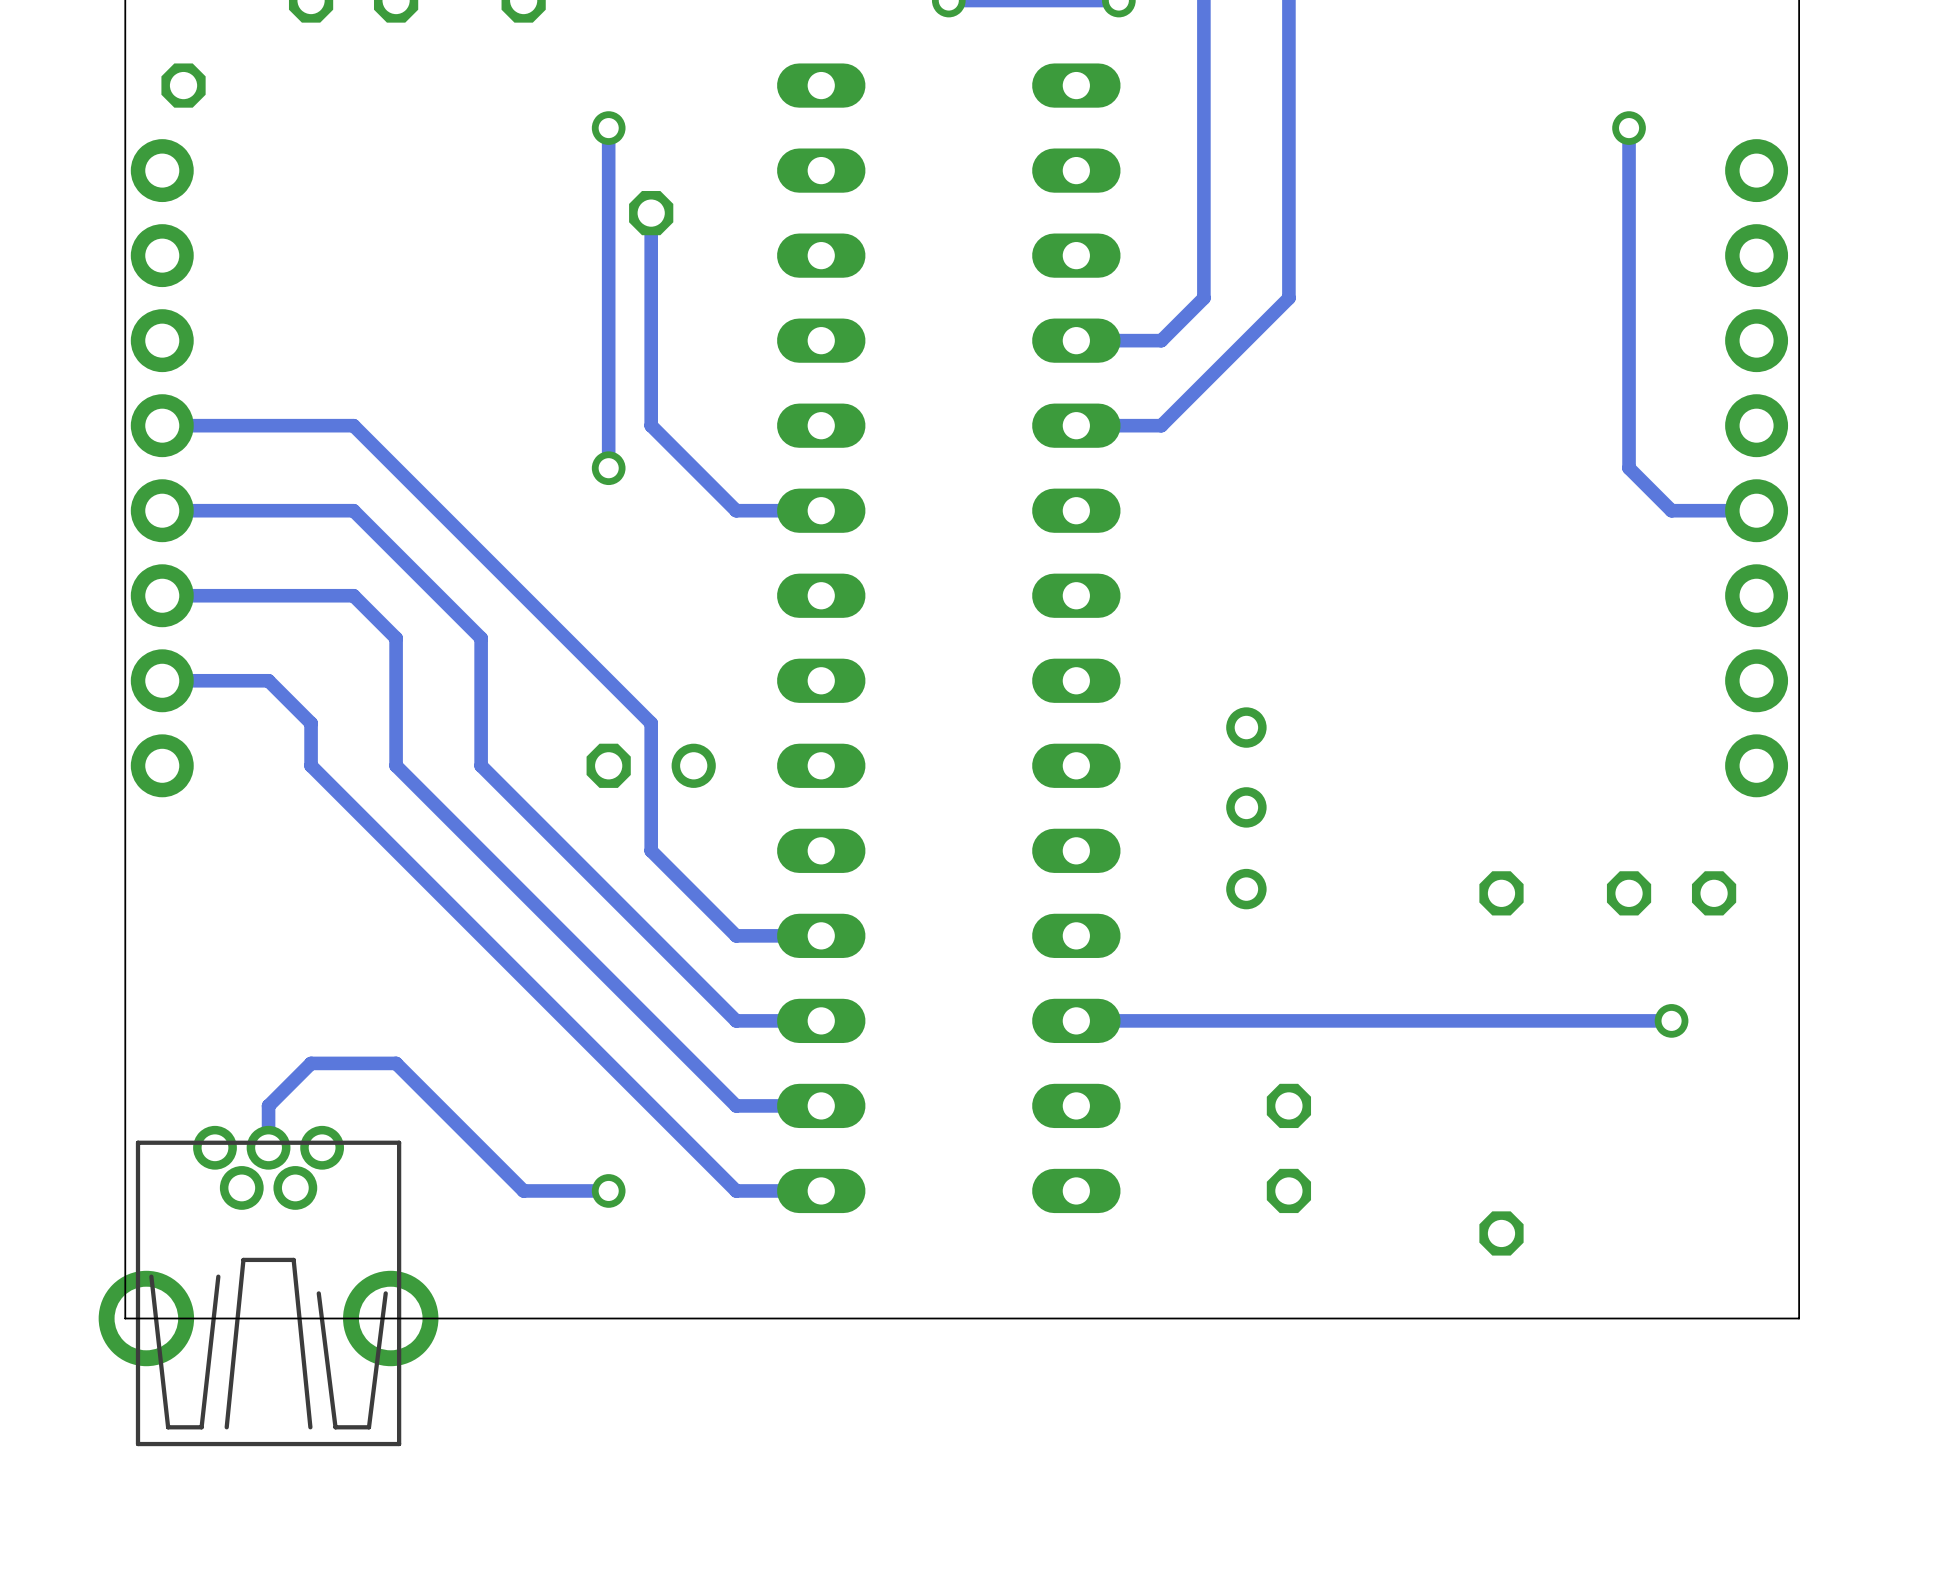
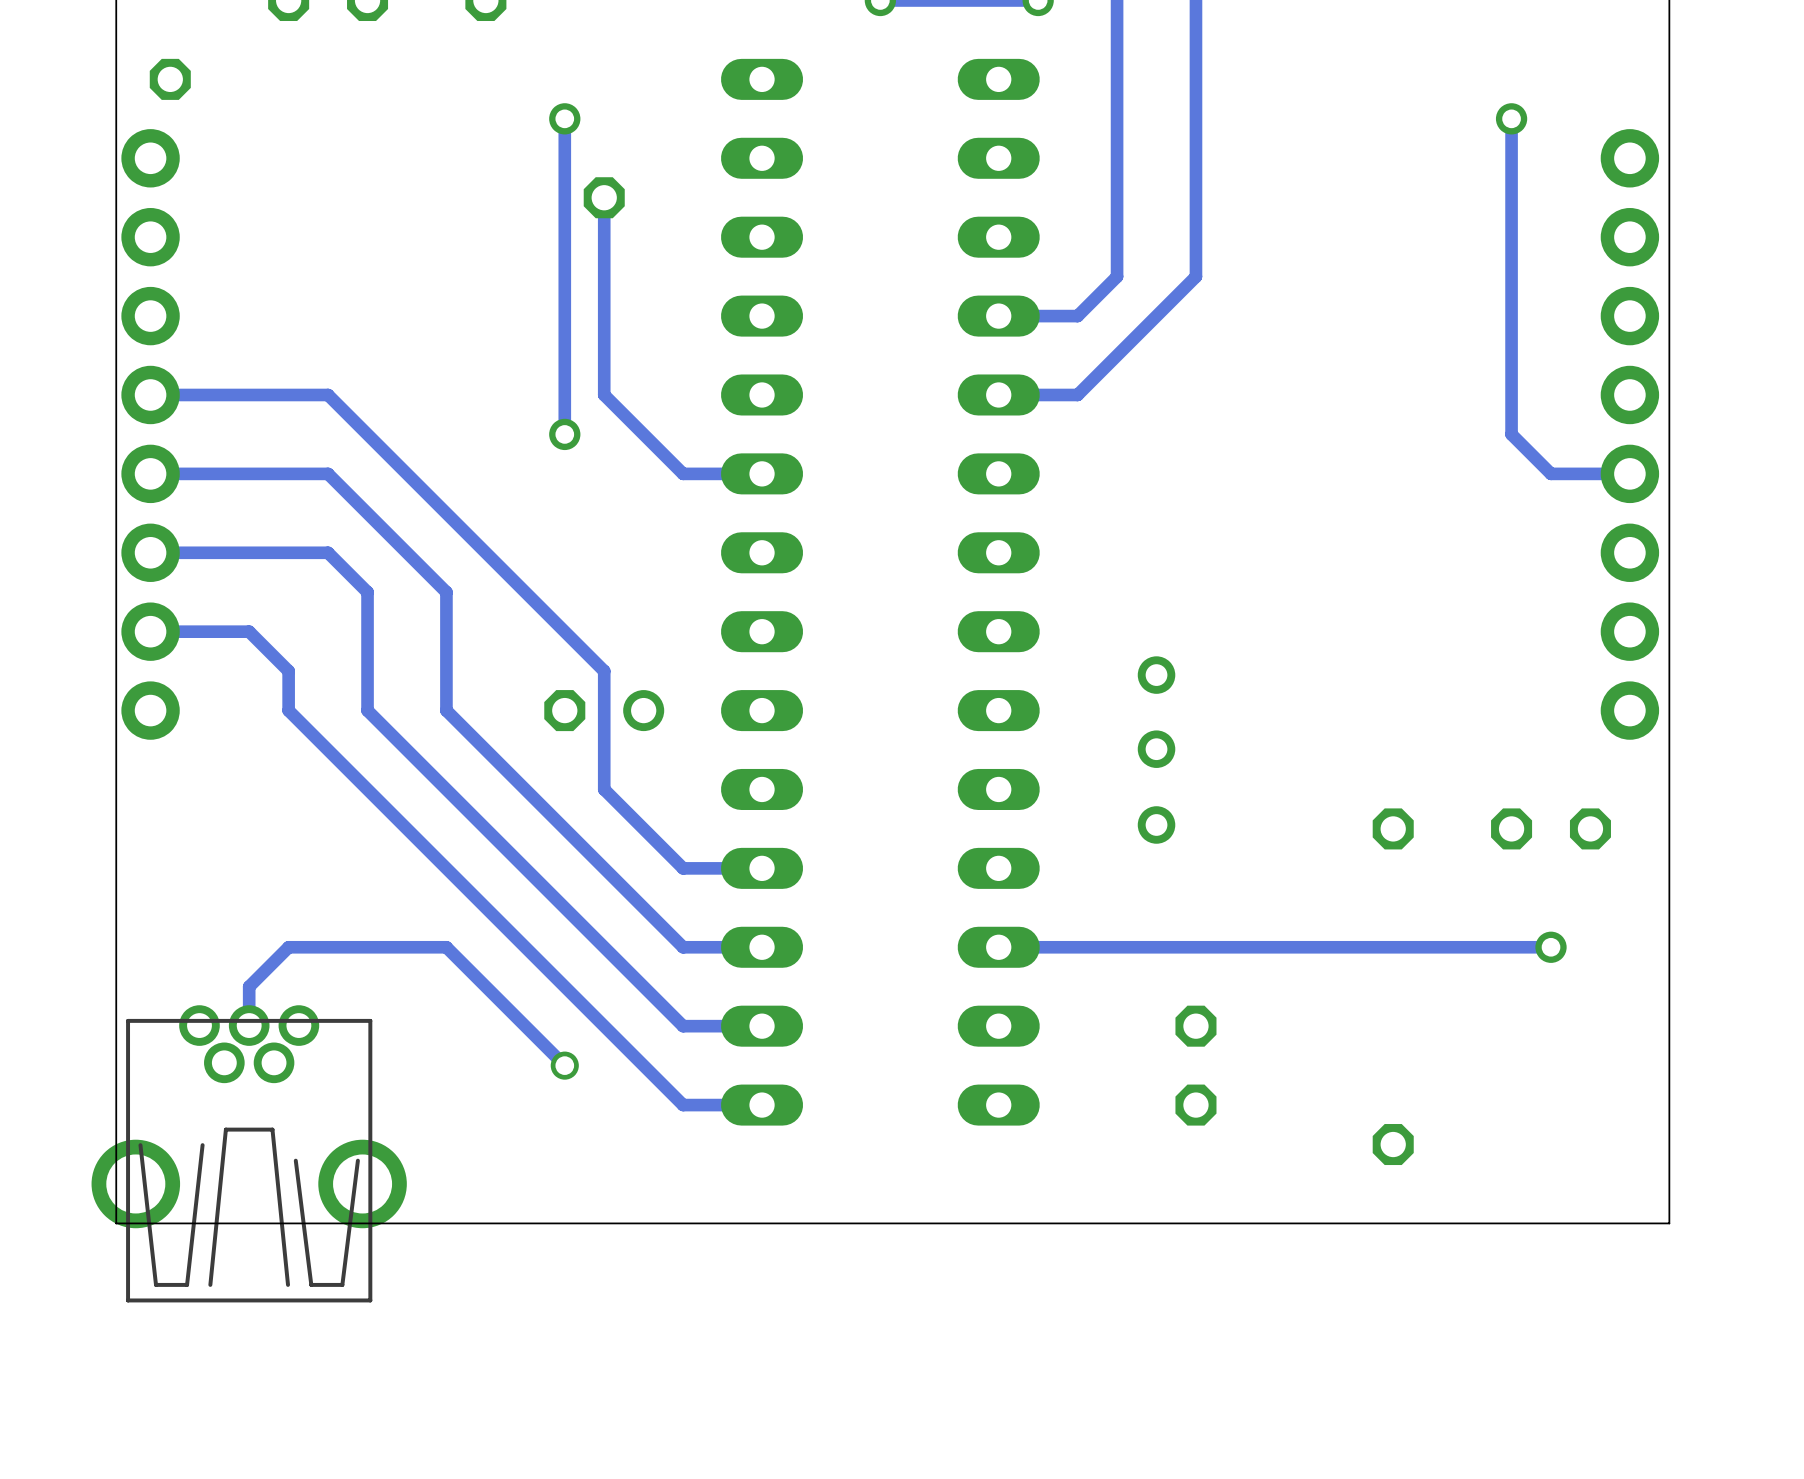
track: none -> (249, 1025) (249, 986) (288, 947) (446, 947) (564, 1065)
track: (268, 1147) (268, 1105) (311, 1063) (396, 1063) (523, 1190) (608, 1190) -> none
via: none -> (564, 1065)
via: (608, 1190) -> none
part position: (268, 1286) -> (249, 1153)

